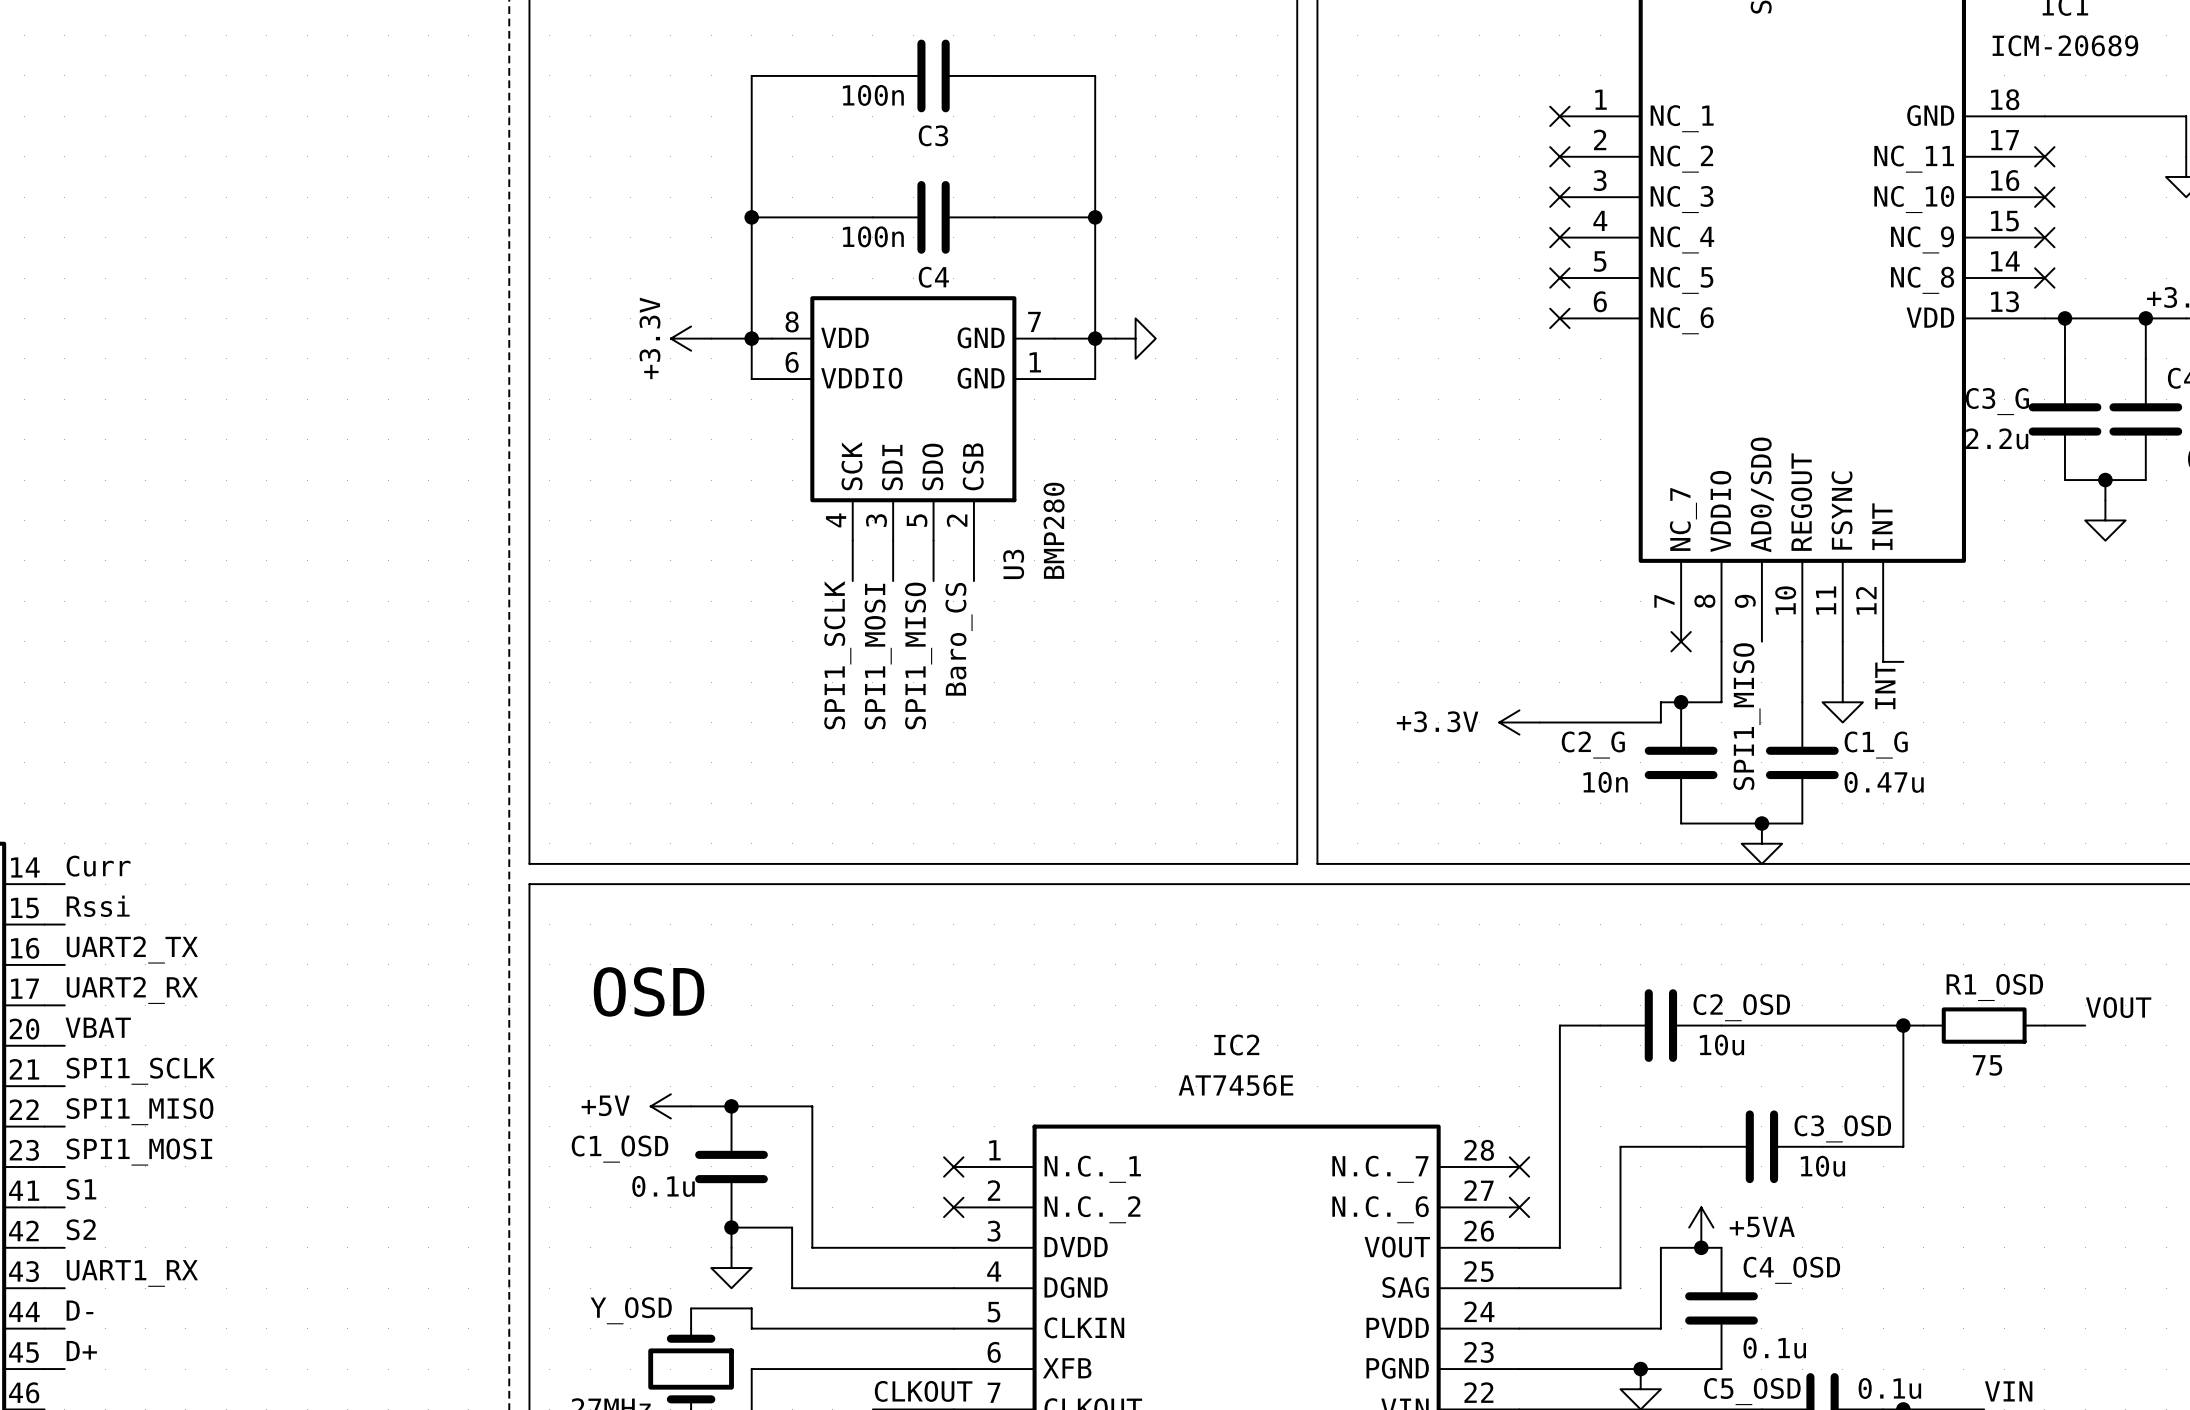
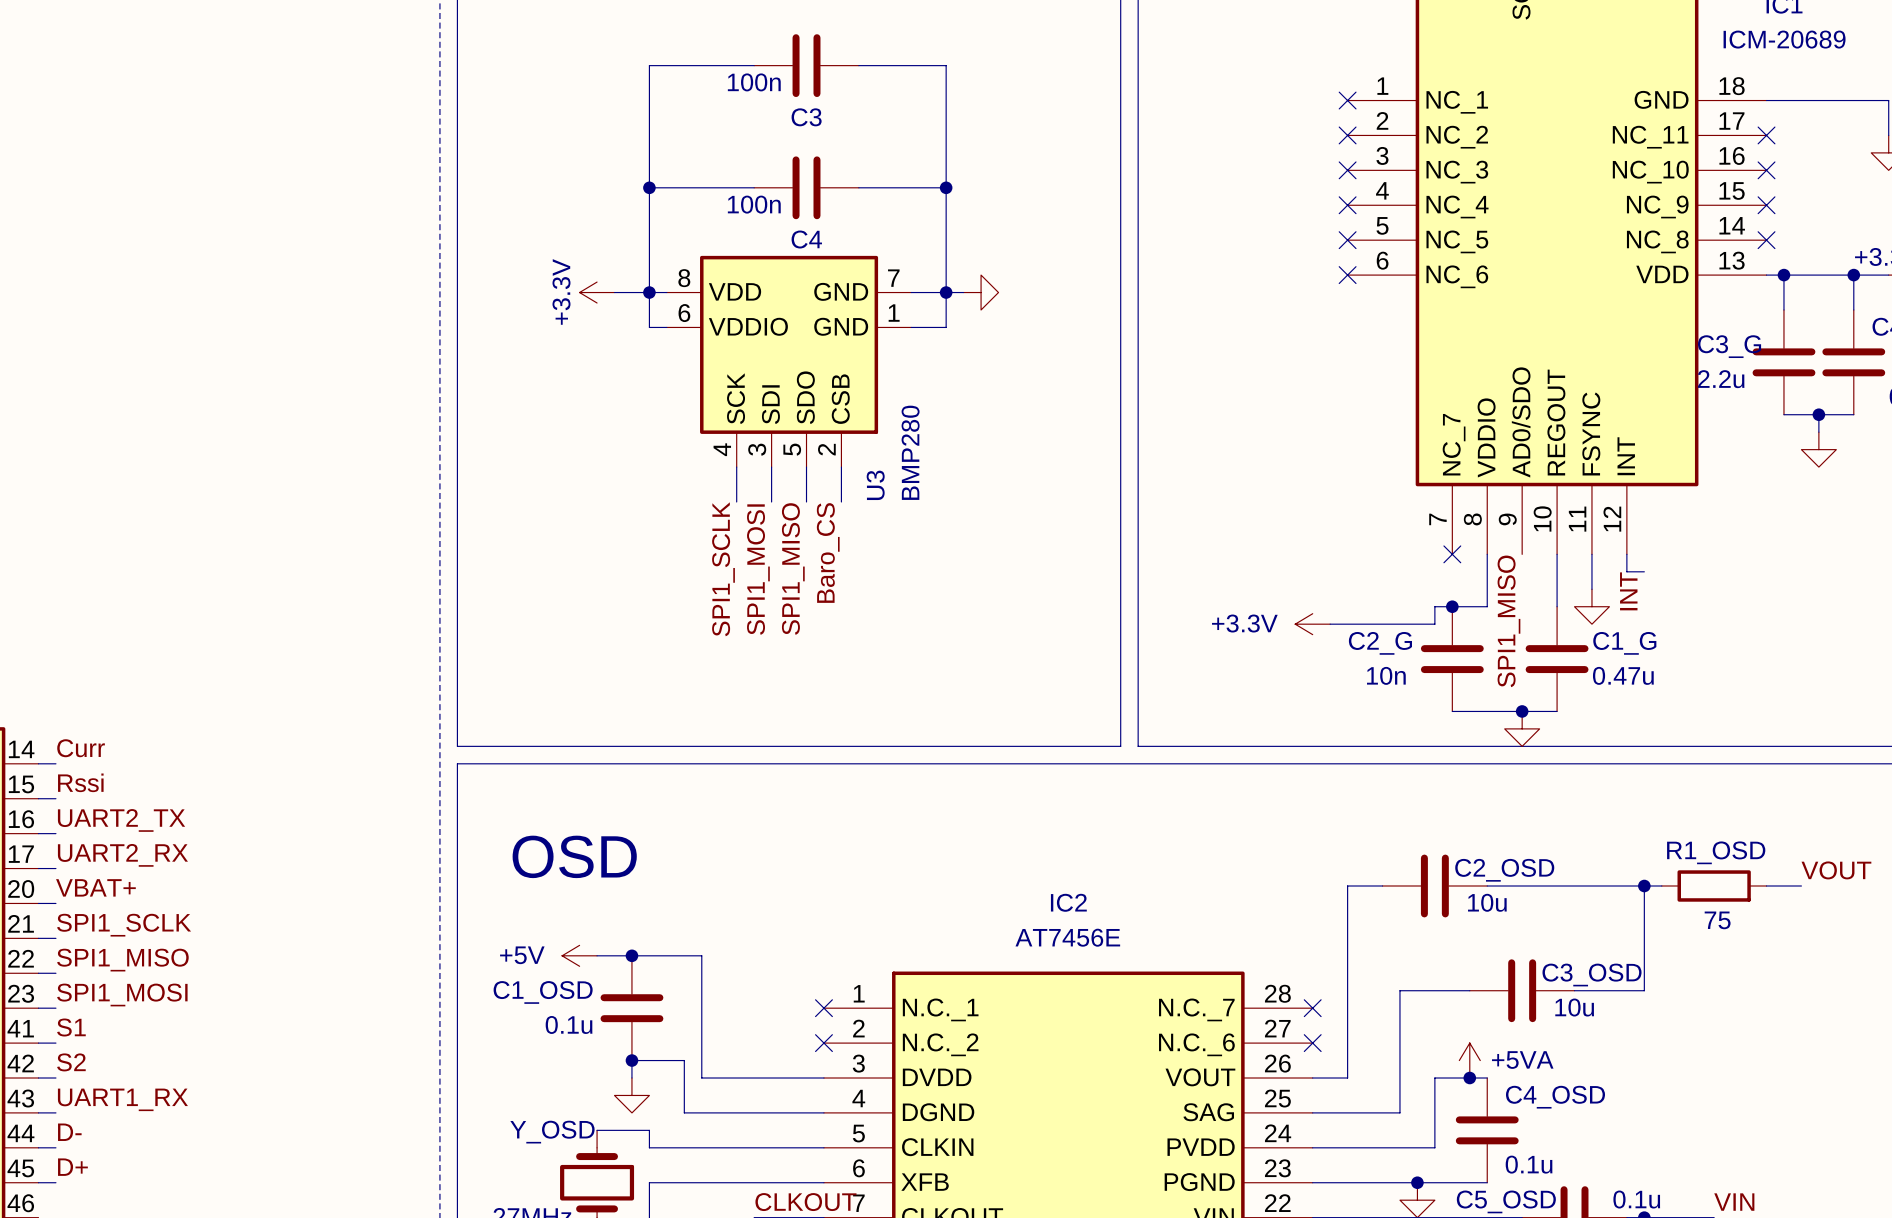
label: VBAT (98, 1027) -> VBAT+ (95, 887)

